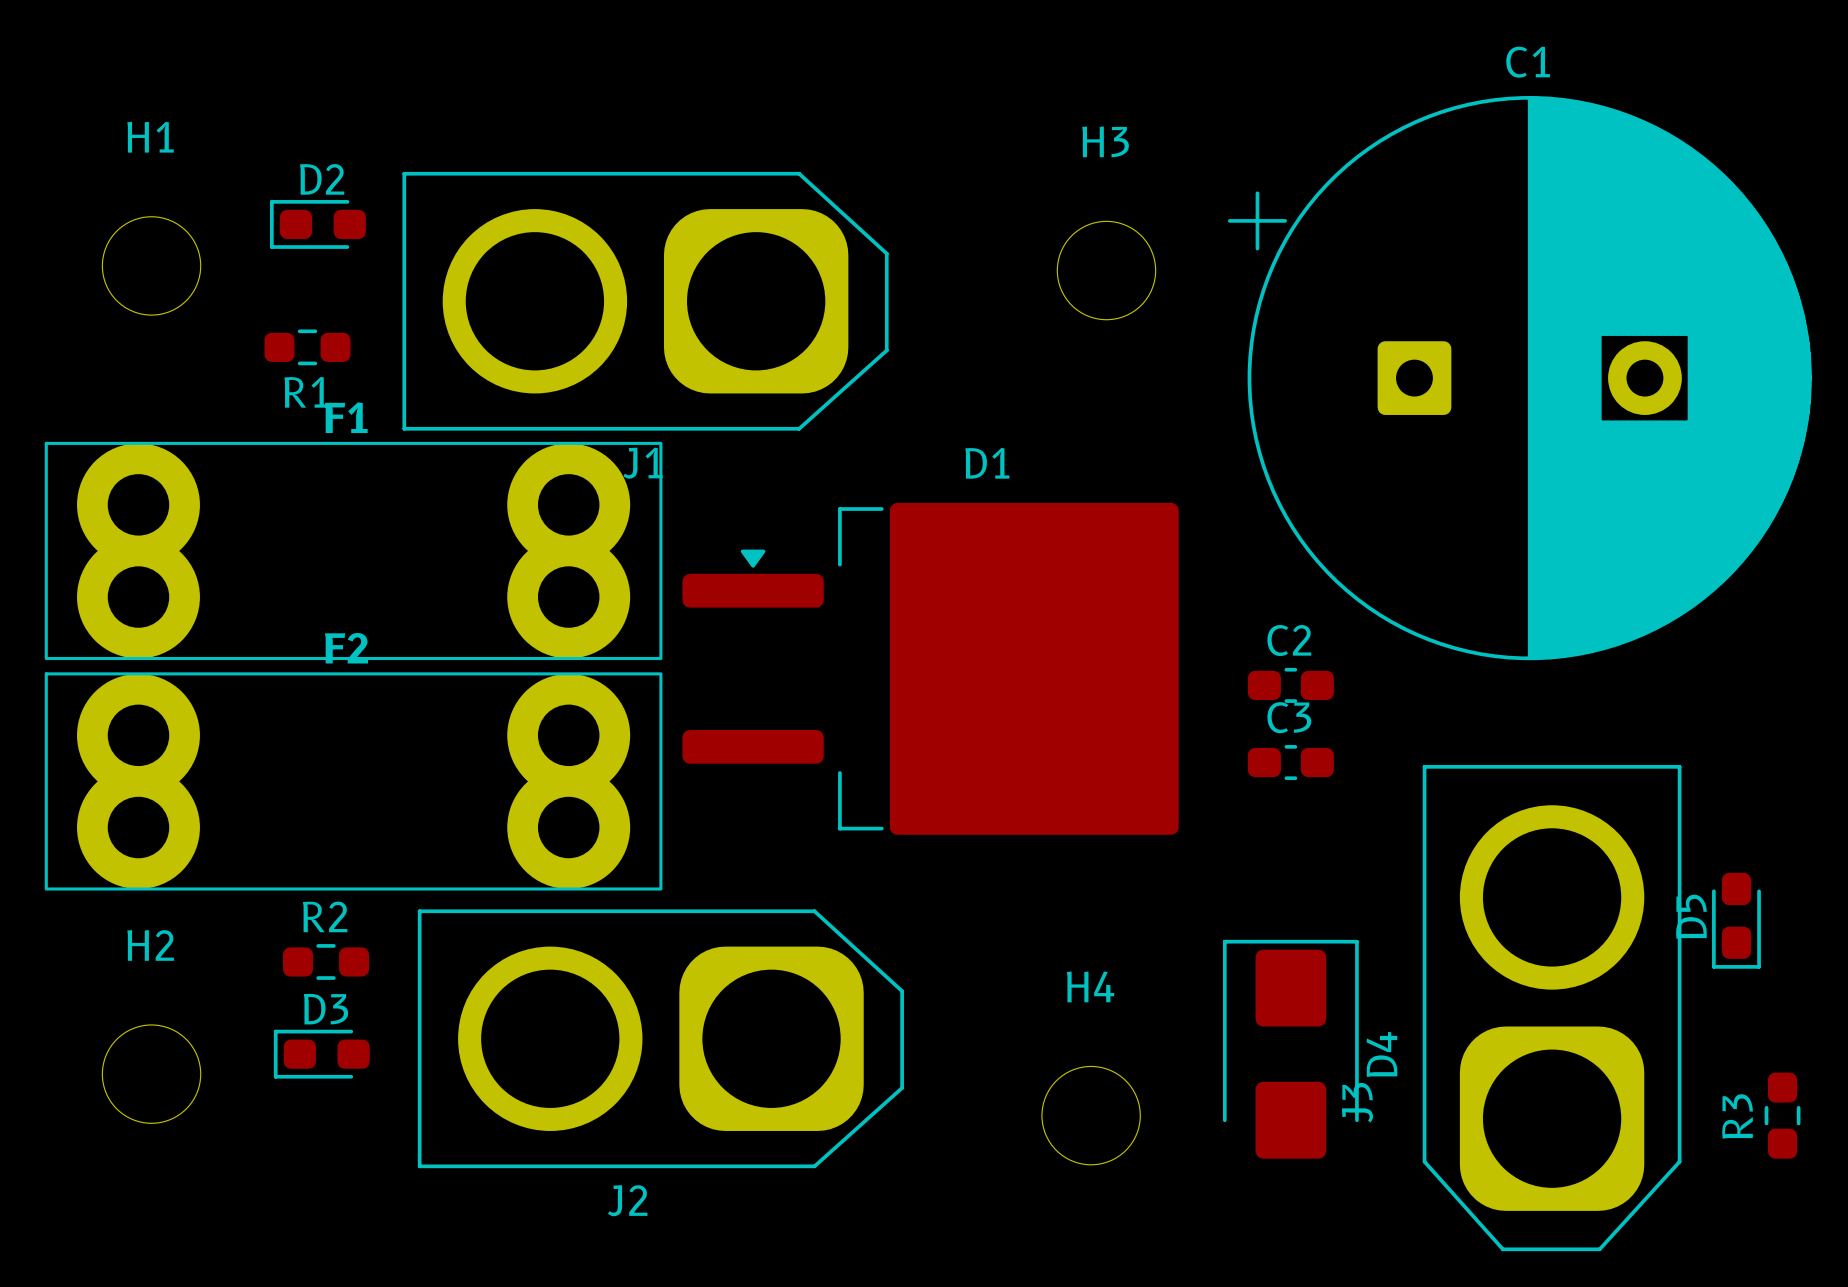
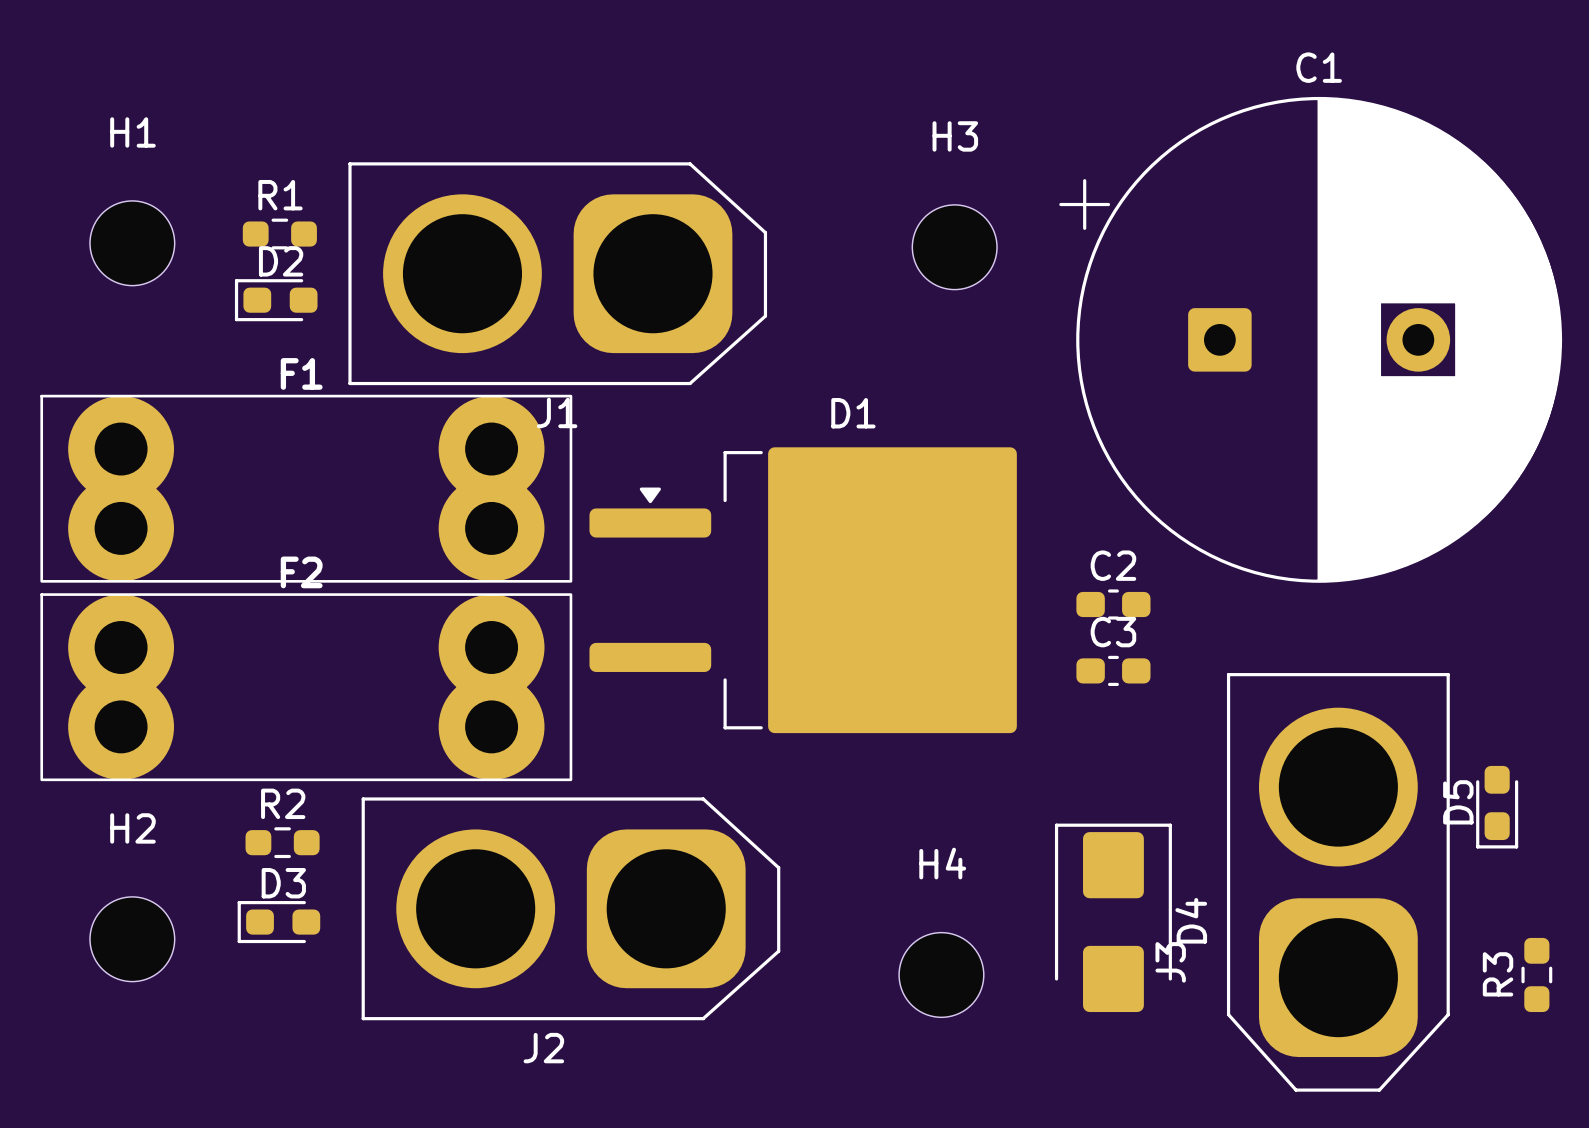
D2 position: (317, 224) -> (276, 300)
R1 position: (307, 347) -> (279, 234)
R1 name position: R1 (306, 392) -> R1 (280, 195)

